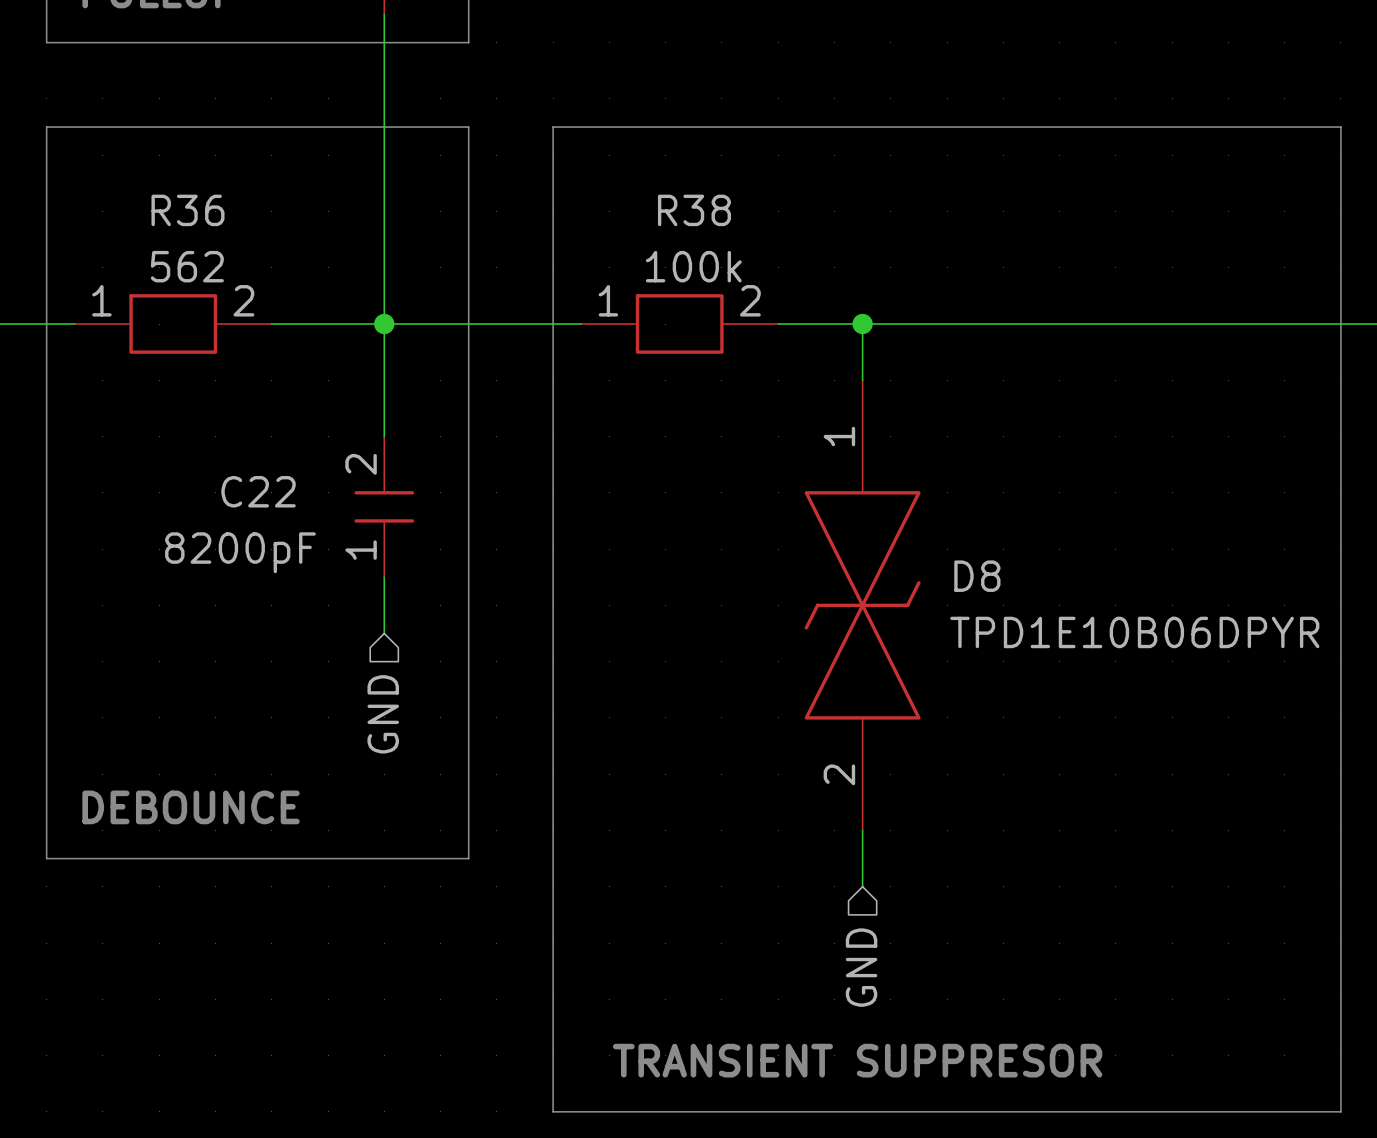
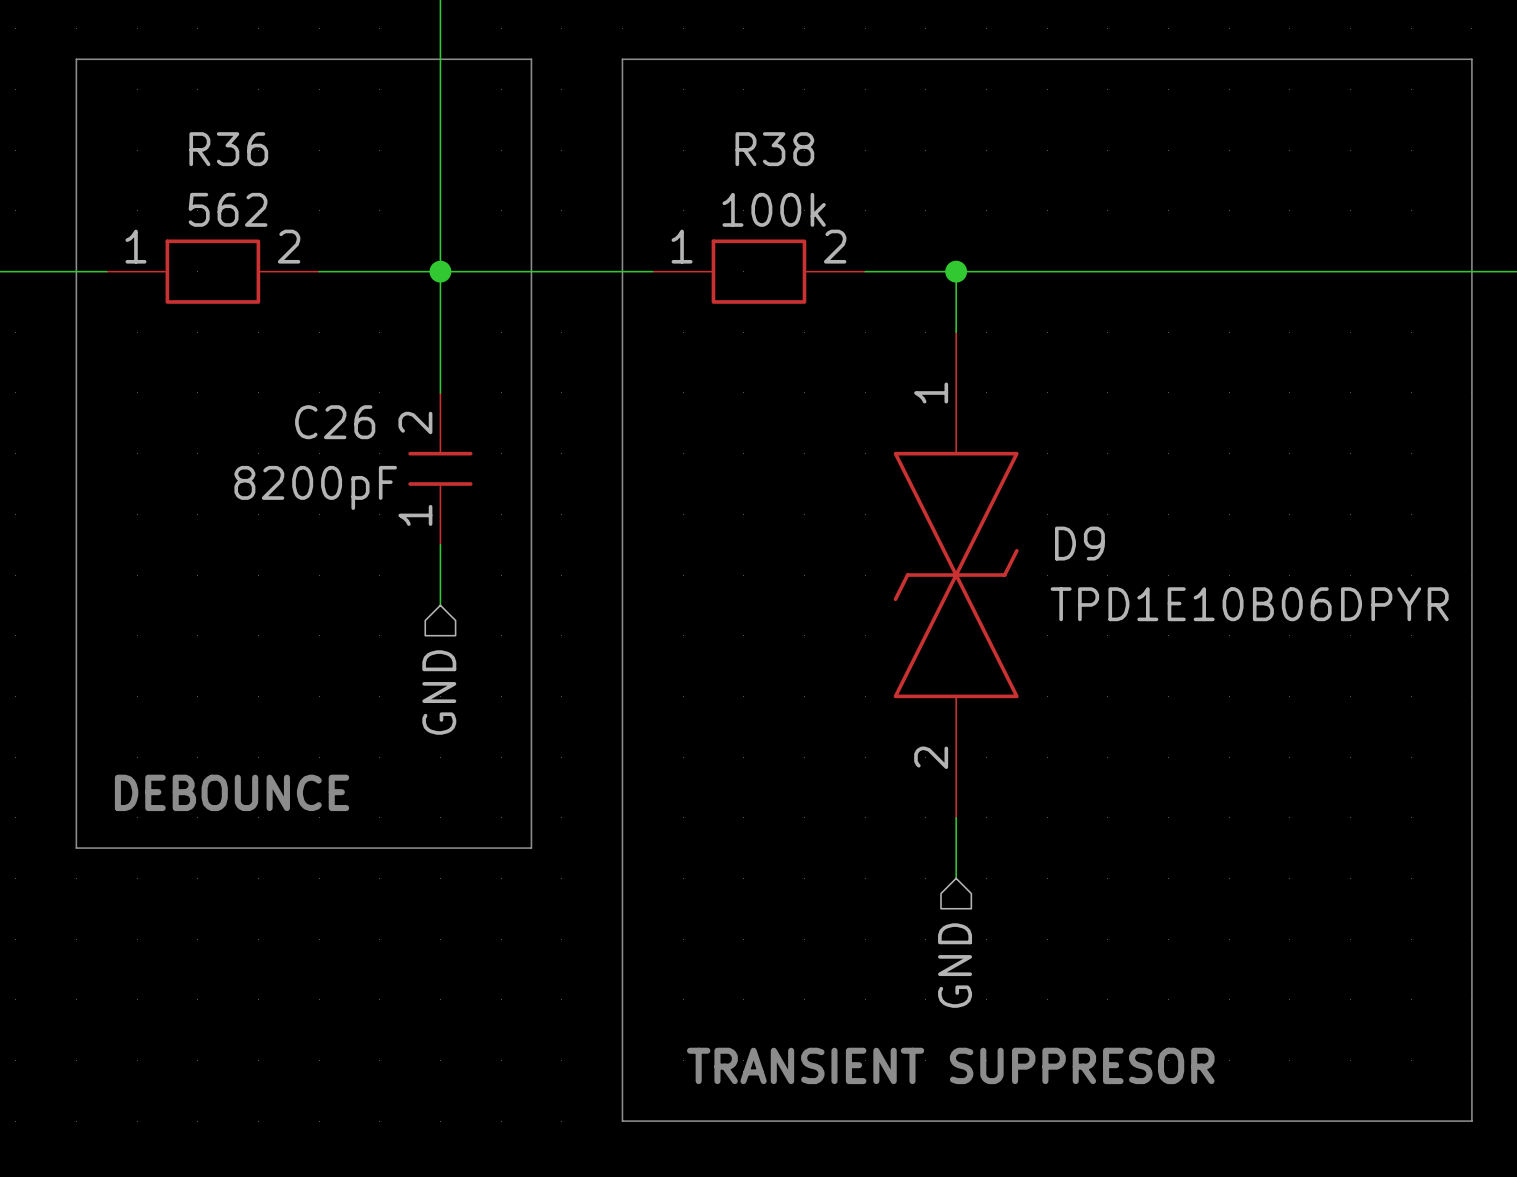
C22 name: C22 (258, 491) -> C26 (335, 422)
C22 value position: 8200pF (240, 552) -> 8200pF (315, 487)
D8 name: D8 (977, 576) -> D9 (1079, 543)

